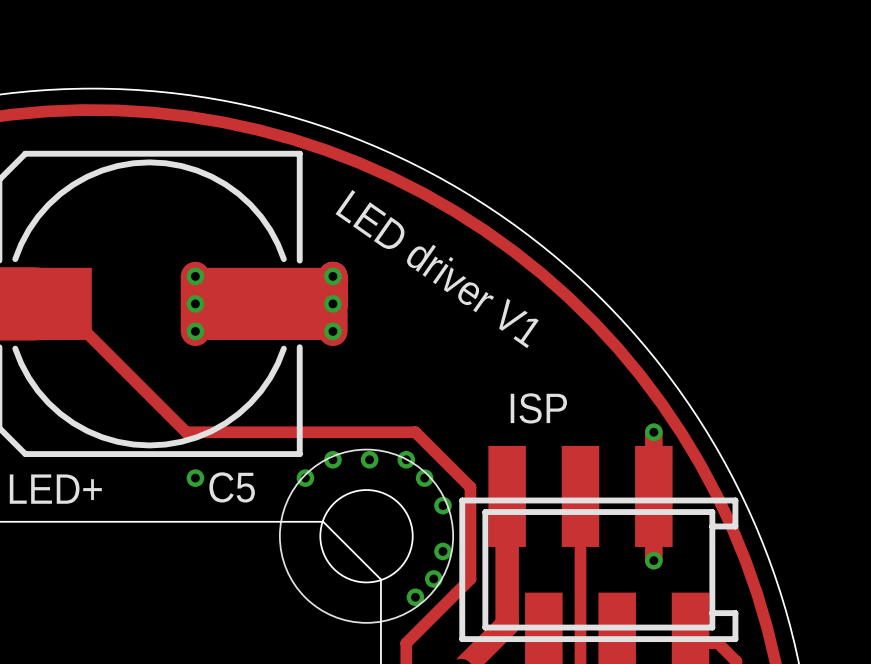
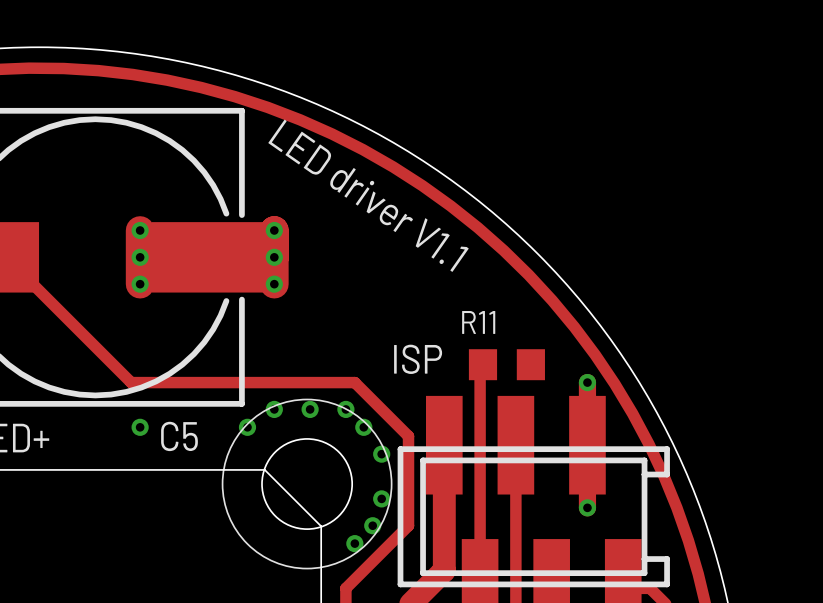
text: LED driver V1 (437, 269) -> LED driver V1.1 (368, 195)
ISP name position: ISP (538, 408) -> ISP (418, 359)
top track: none -> (482, 364) (480, 367) (480, 588)
R11: none -> (506, 364)

